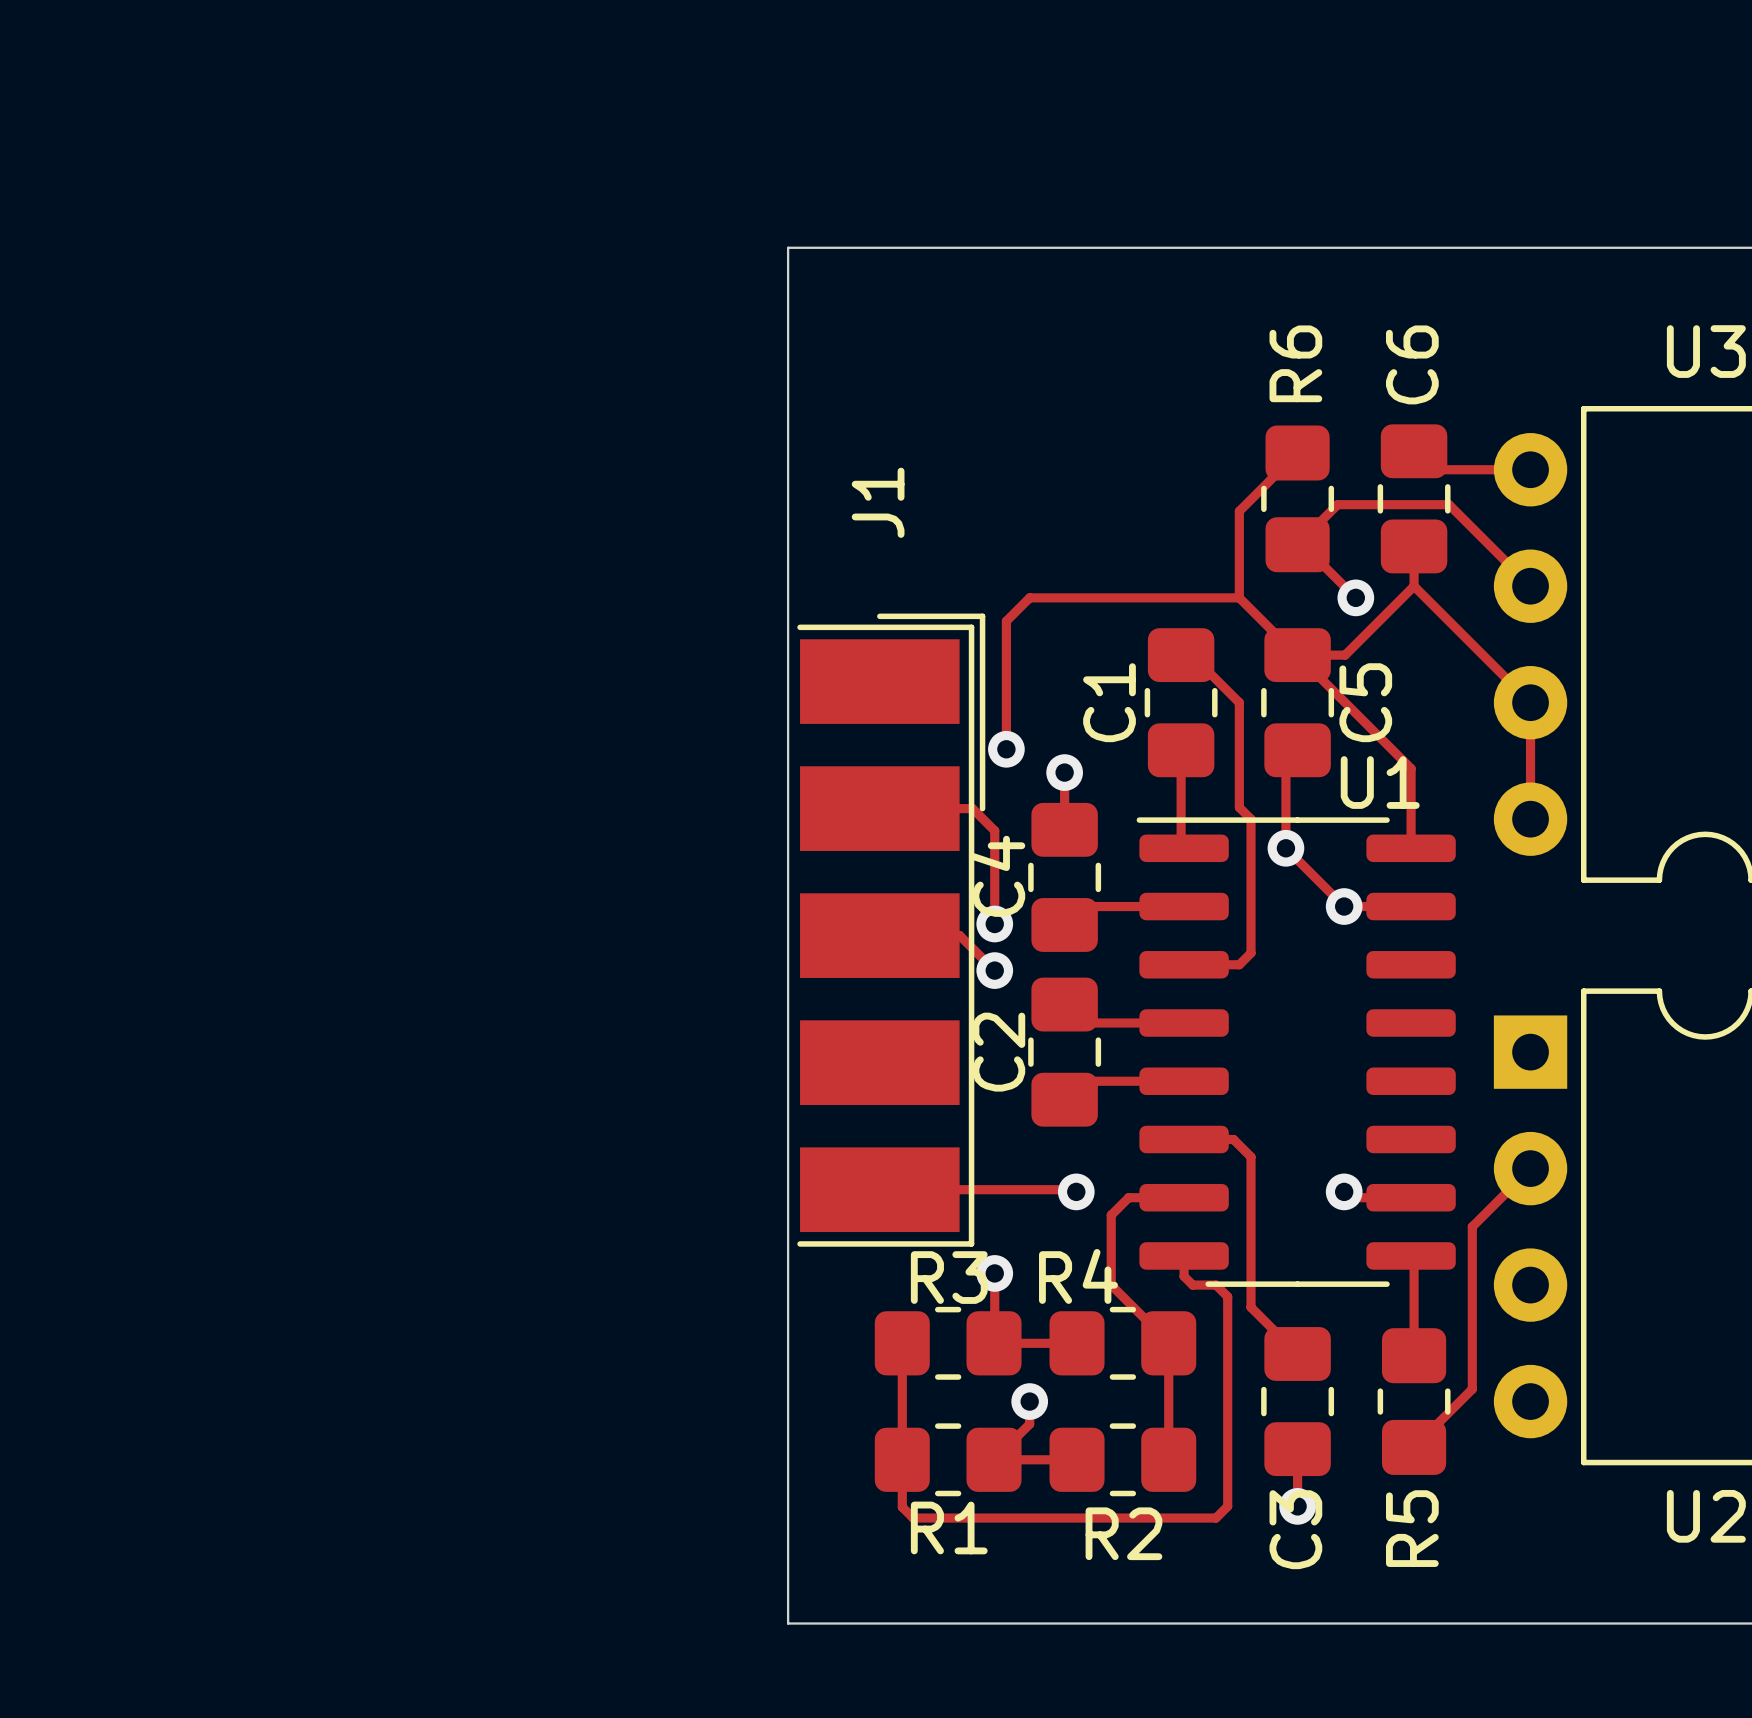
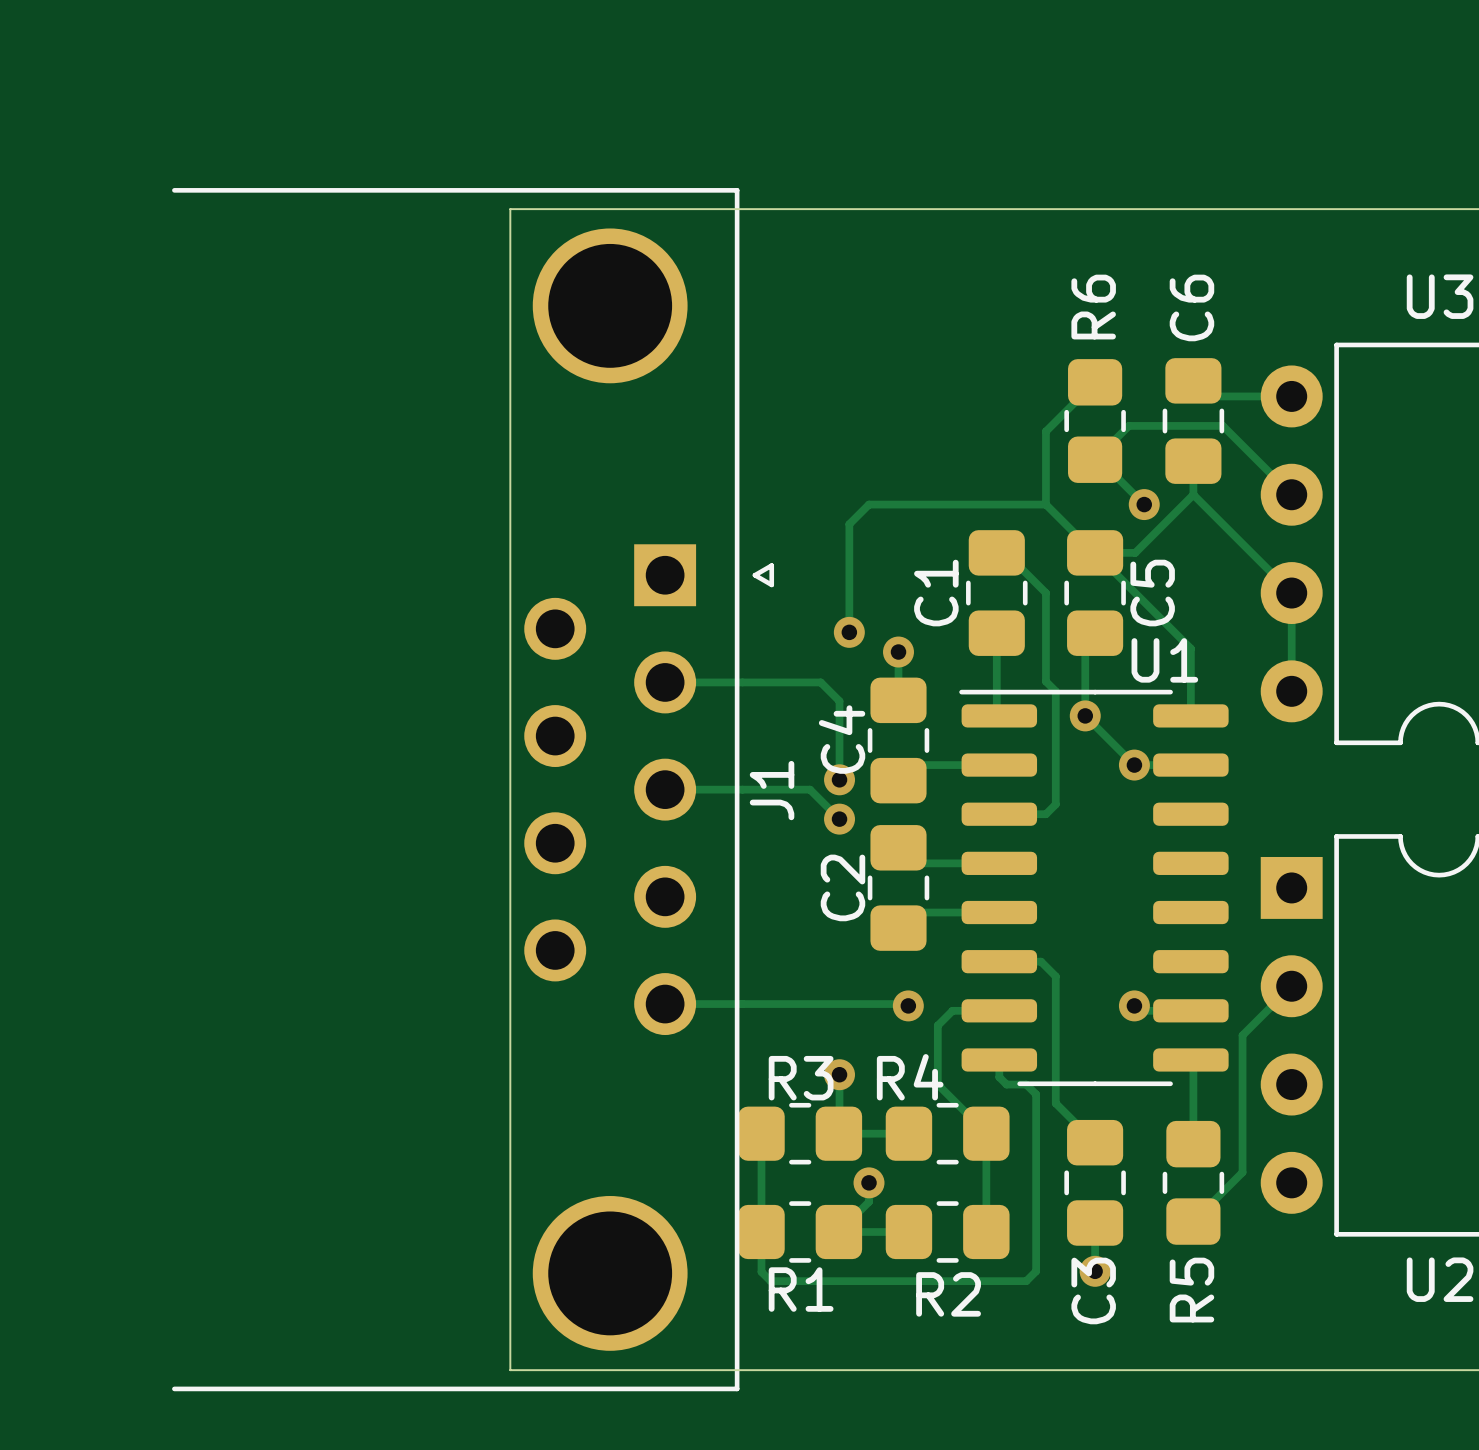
board edge: (788, 247) (788, 1623) -> (665, 209) (510, 209) (510, 1370) (665, 1370)
J1 name position: J1 (878, 502) -> J1 (772, 790)
J1 footprint: [797, 613, 986, 1247] -> [172, 188, 775, 1392]
track: none -> (665, 682) (742, 682)
track: none -> (665, 789) (742, 789)
track: none -> (665, 1004) (742, 1004)

